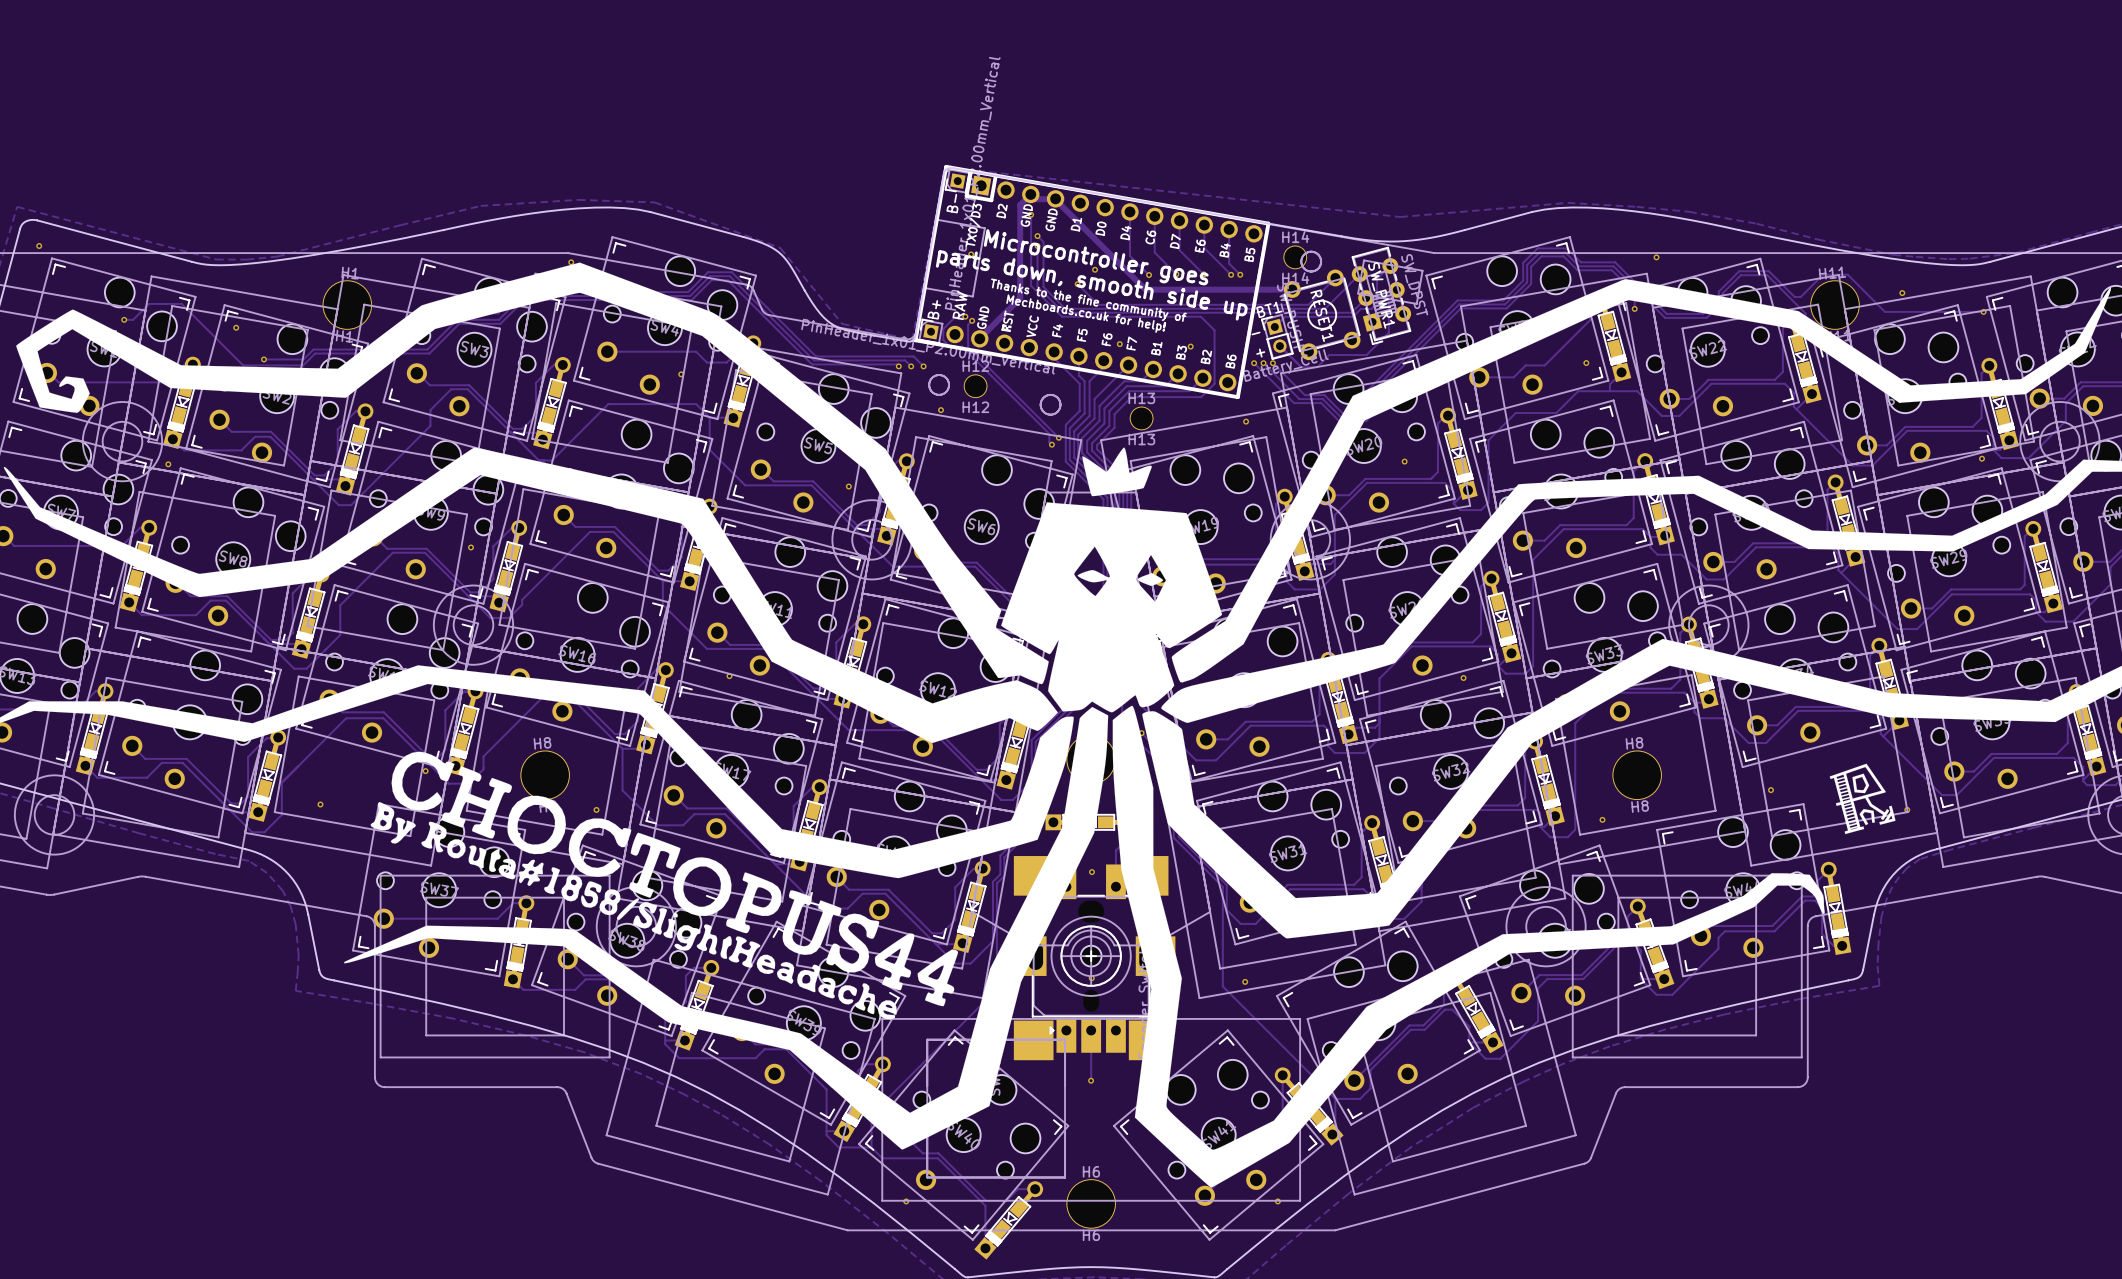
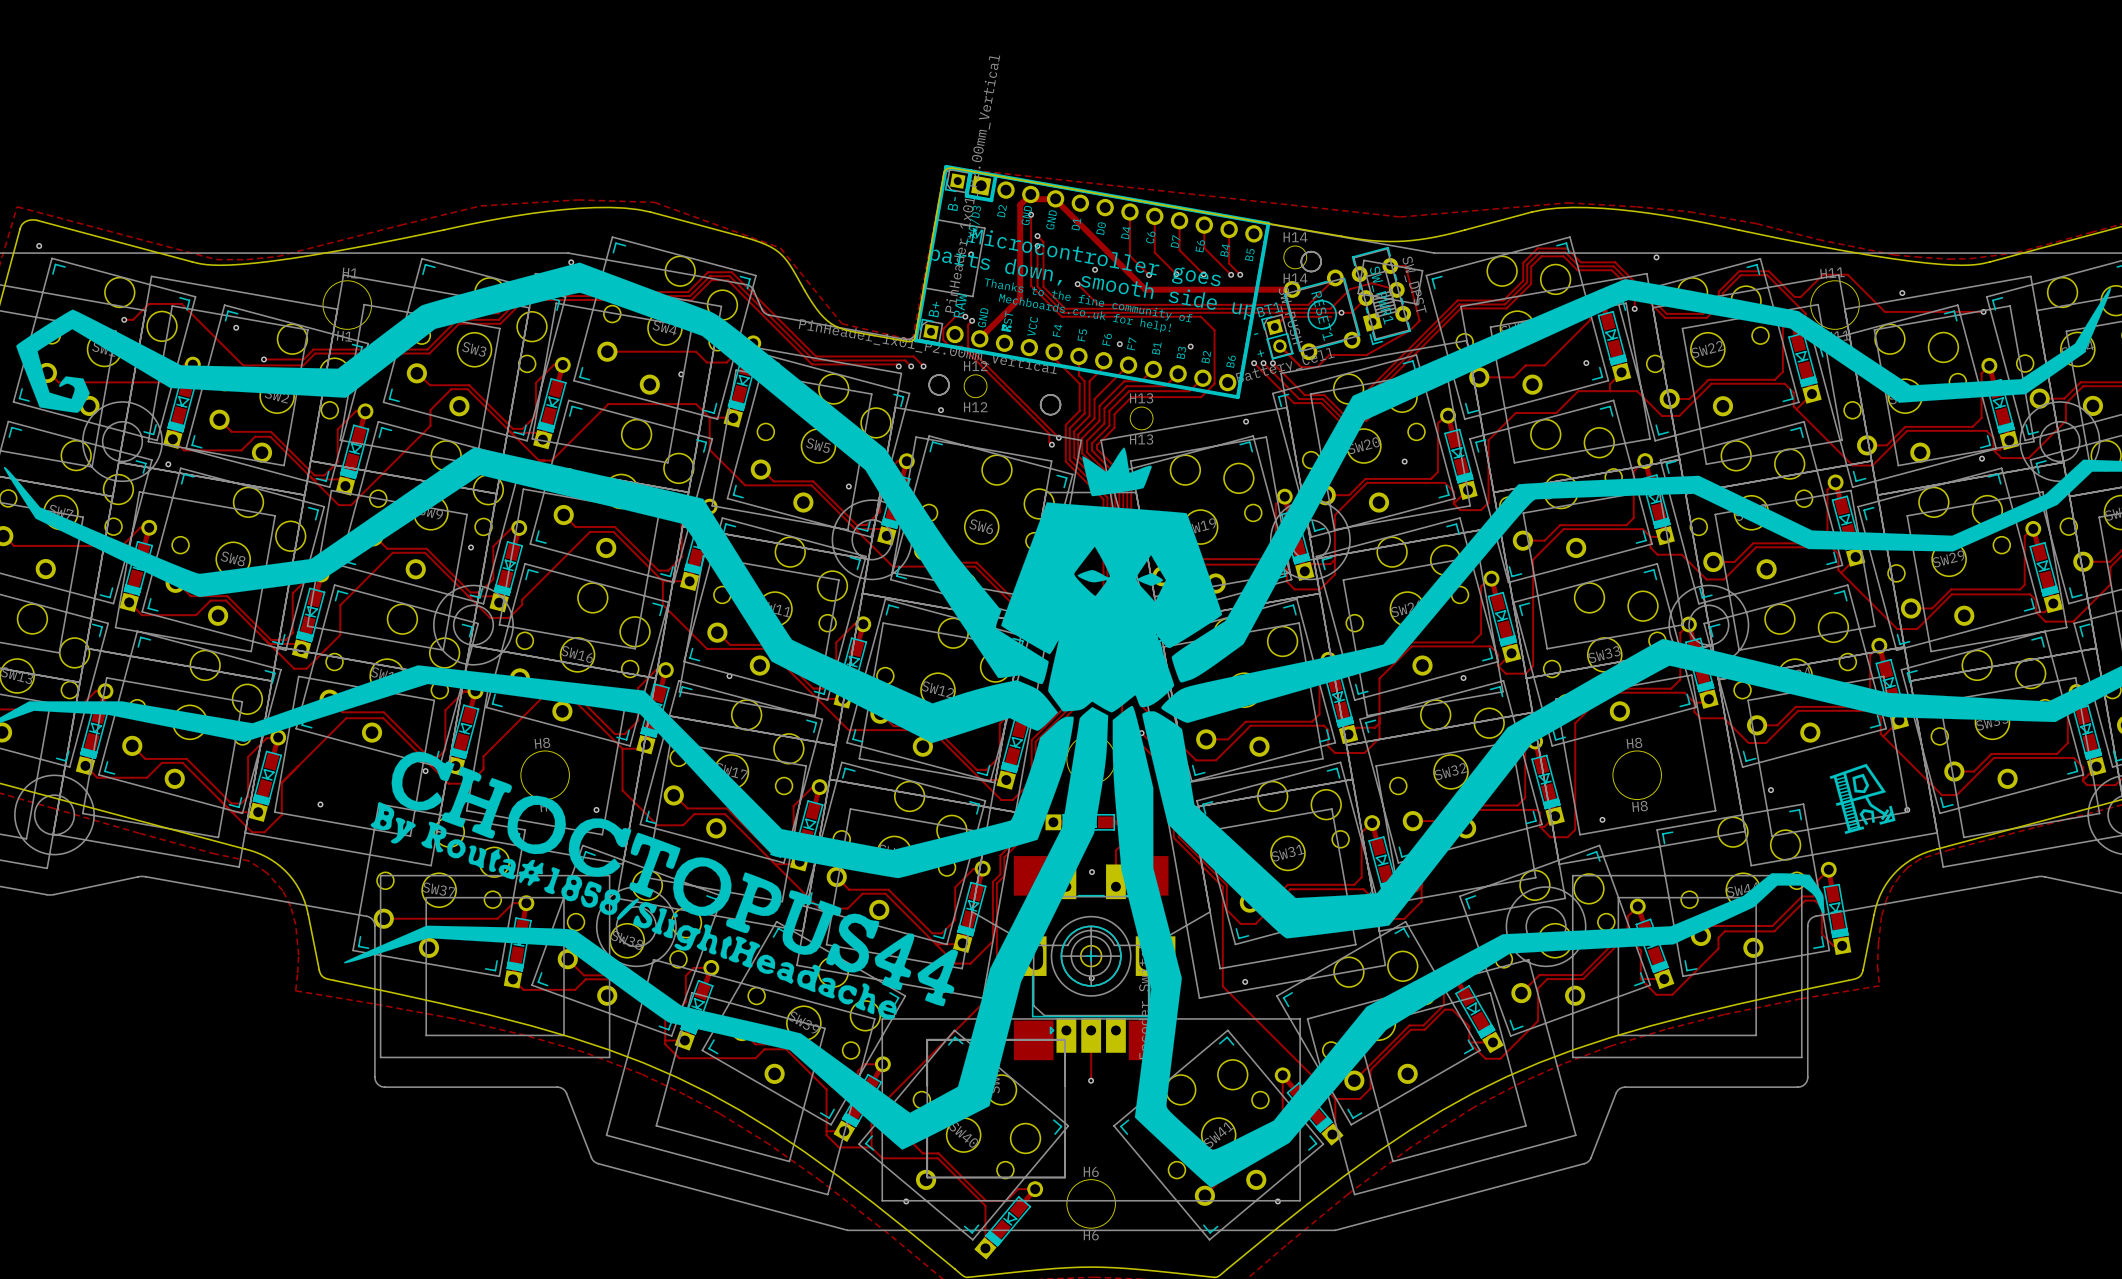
track: (1390, 265) (1377, 279) (1377, 303) (1371, 309) (1360, 309) (1353, 316) (1331, 316) -> none
track: (1359, 274) (1325, 308) -> (1396, 289) (1372, 283) (1350, 289) (1330, 308) (1325, 308)
track: (1396, 289) (1388, 297) (1388, 332) (1366, 355) -> (1390, 265) (1405, 266) (1419, 320) (1409, 330) (1366, 355)
via: none -> (1341, 312)

